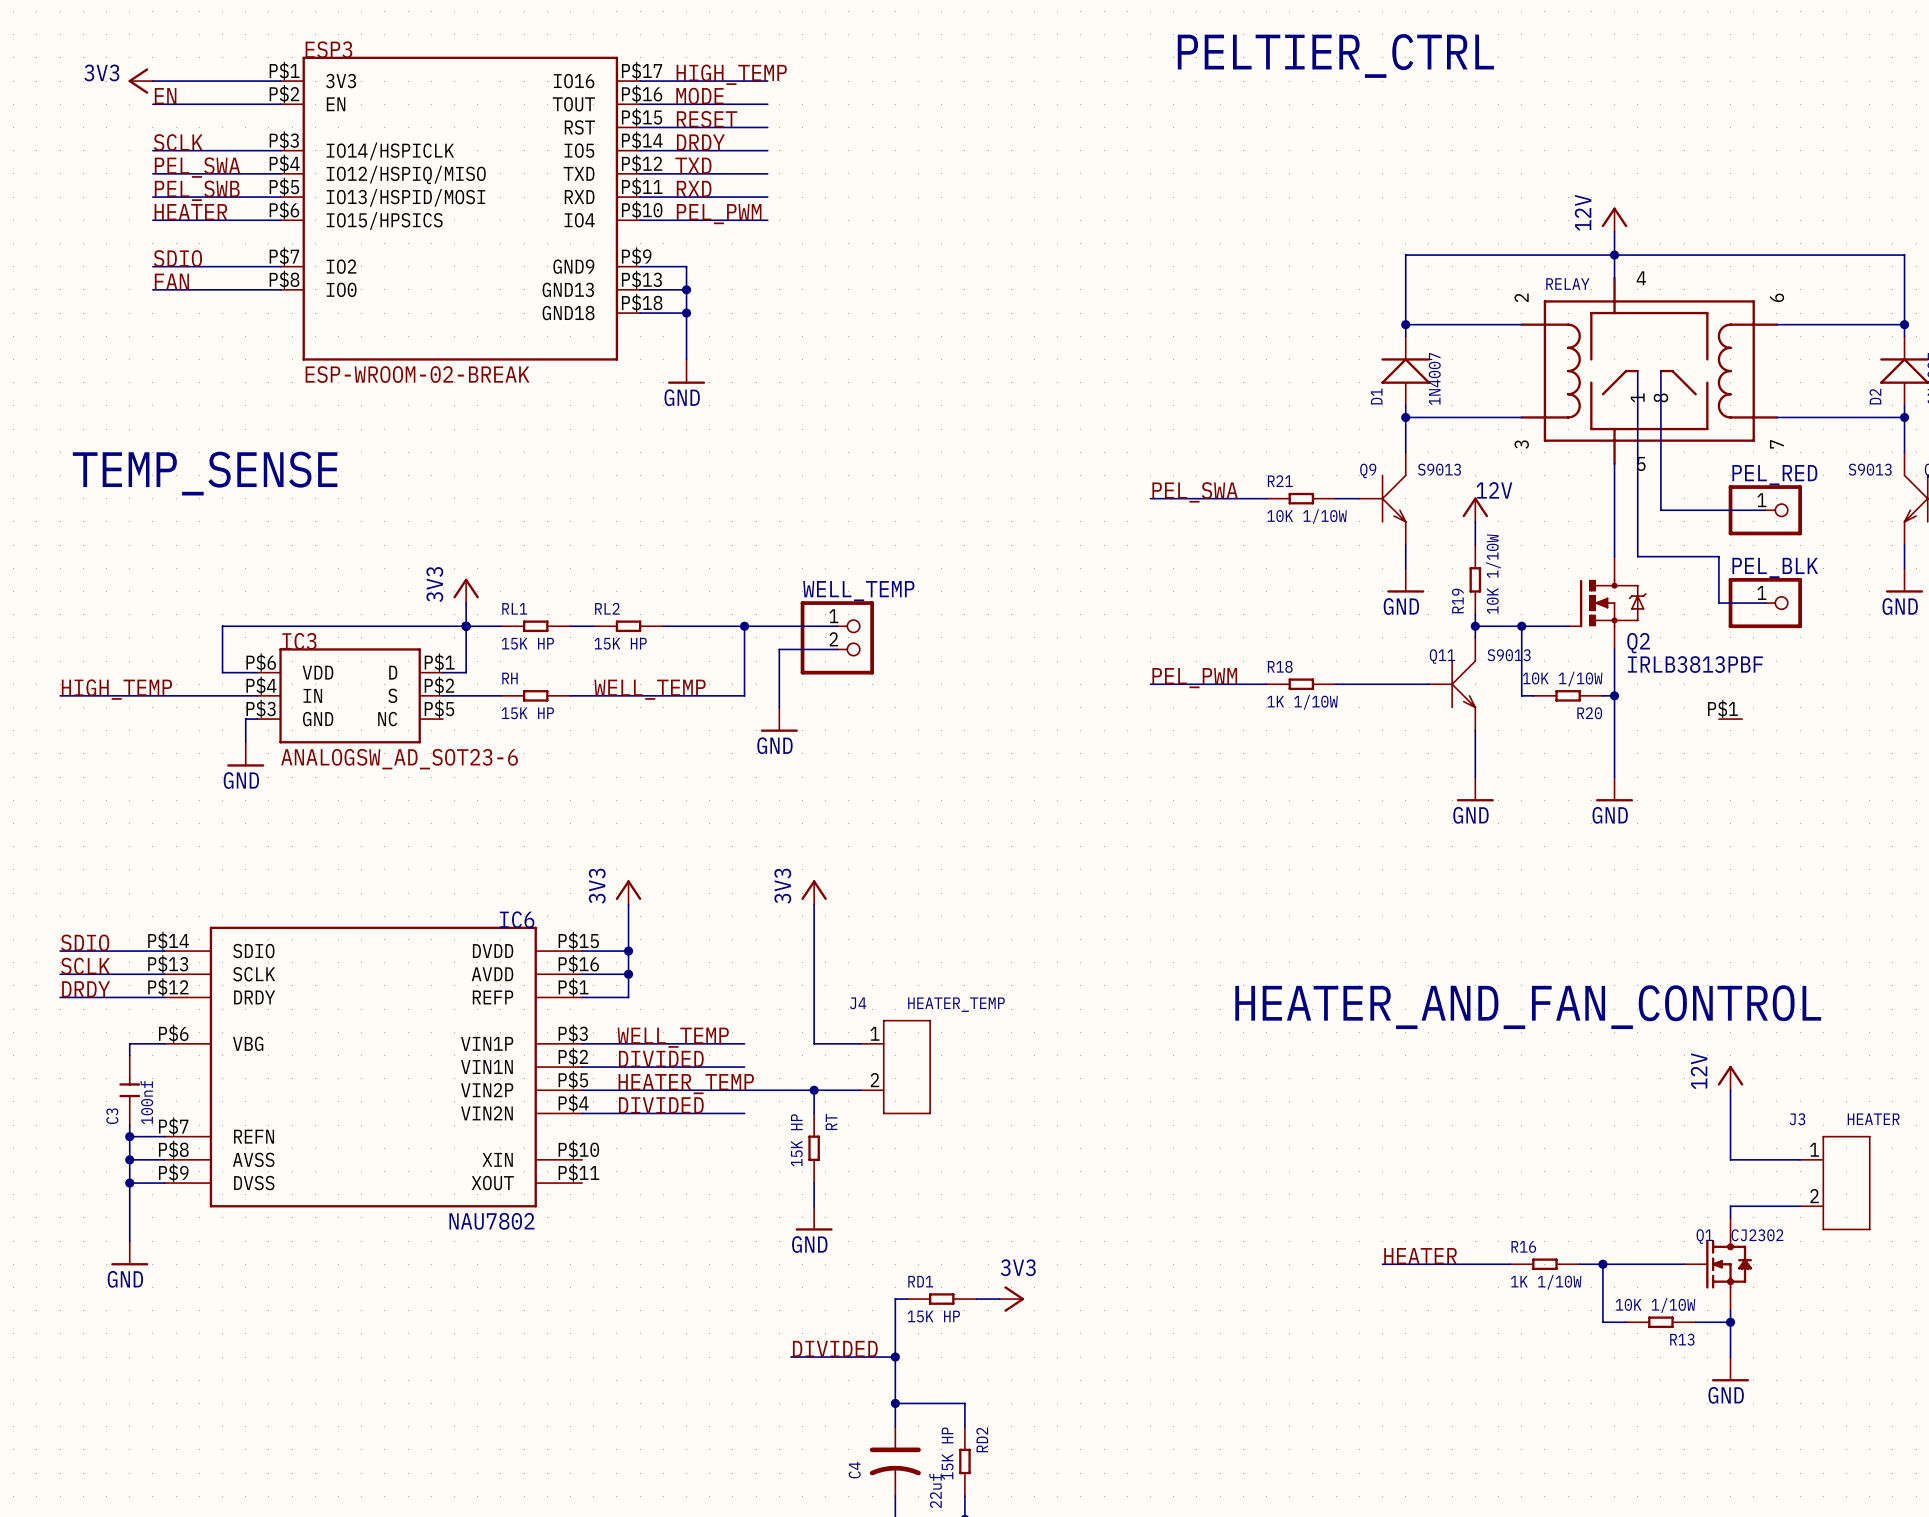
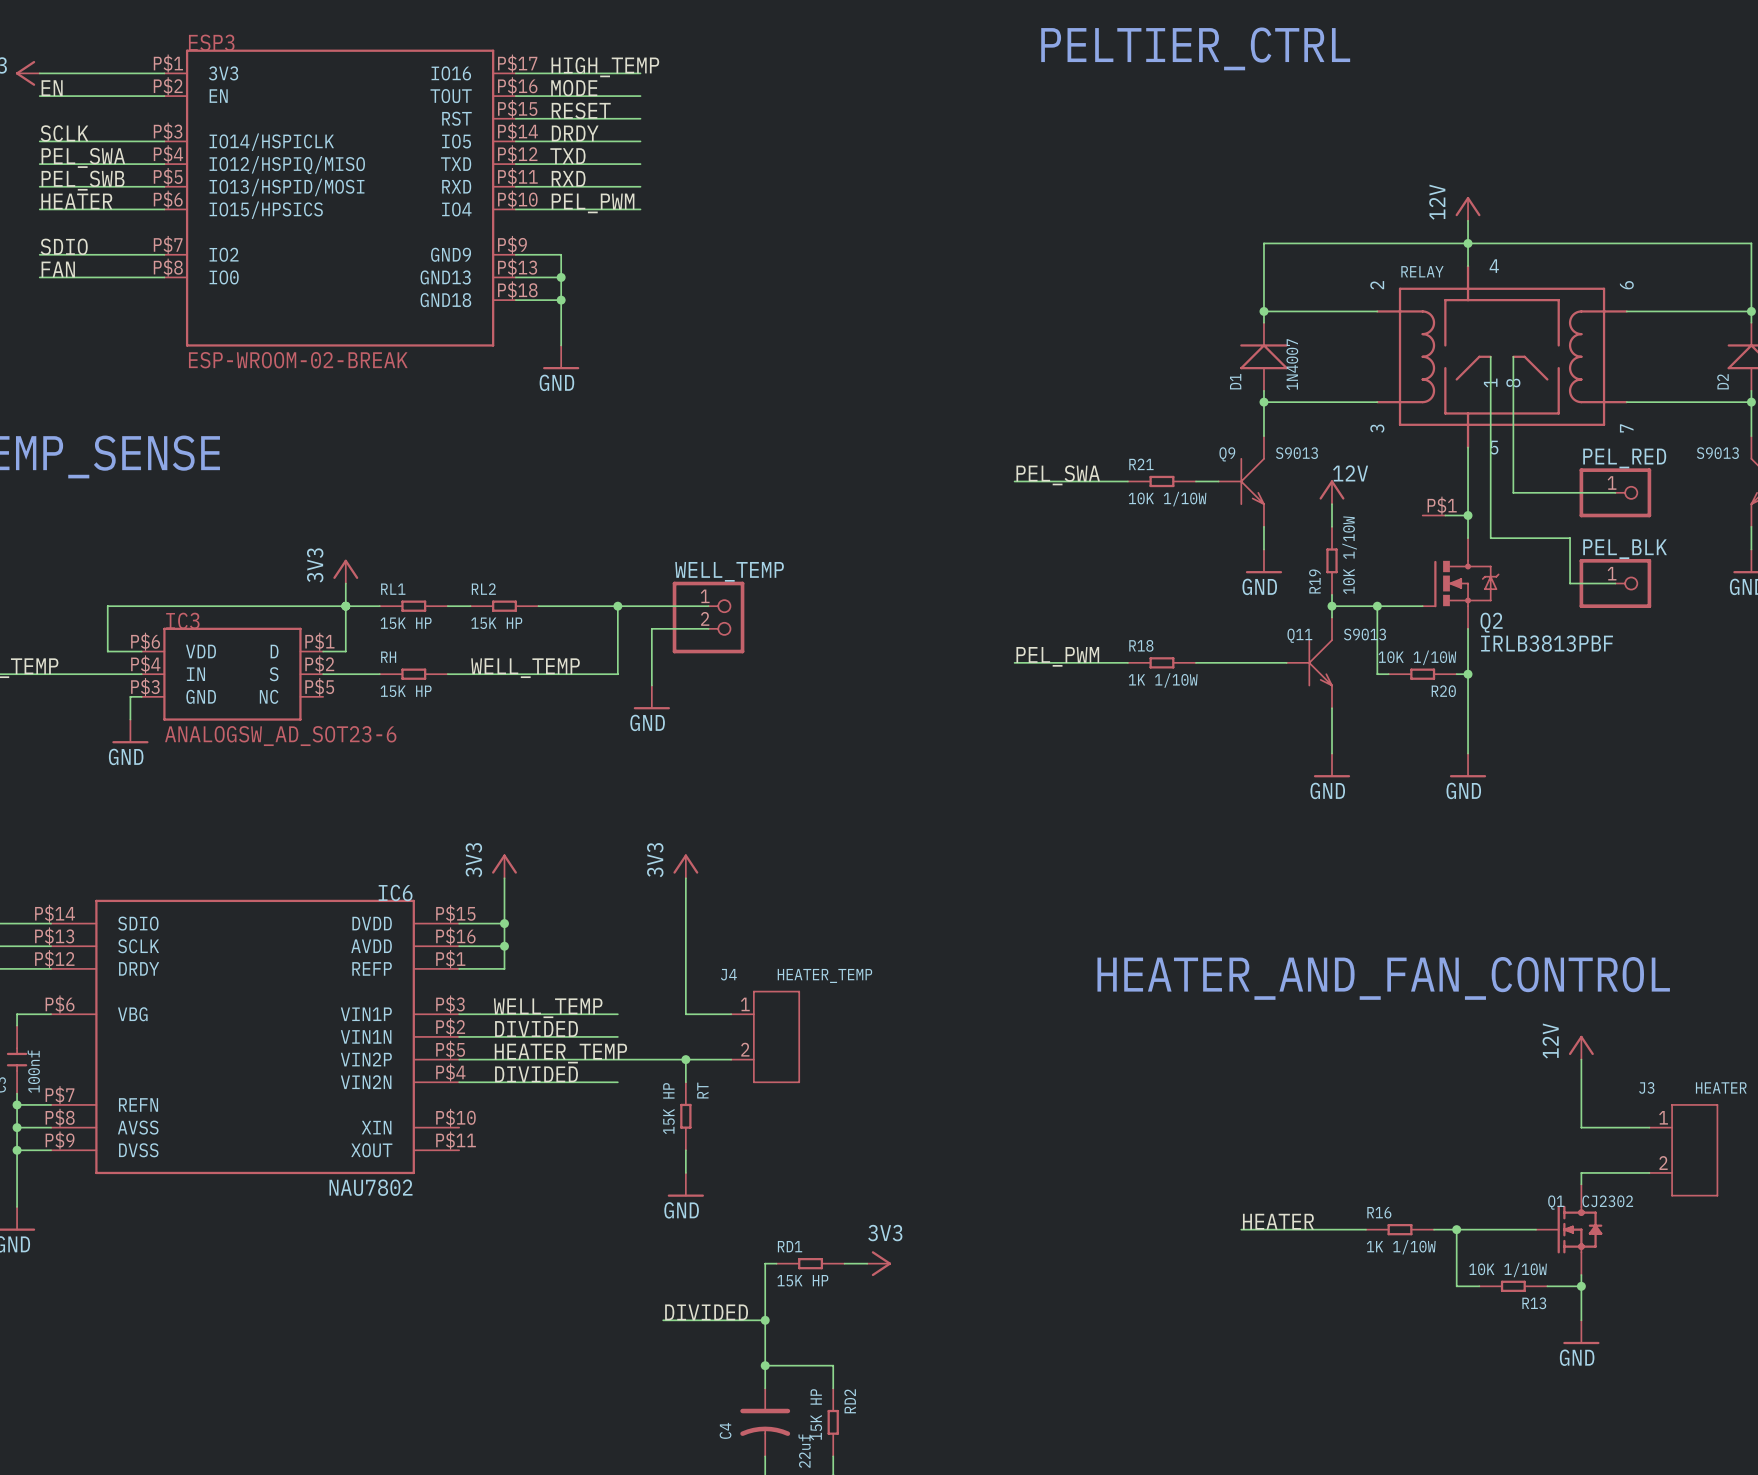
part: none -> (1434, 515)
wire: none -> (1445, 515) (1468, 515)
junction: none -> (1468, 515)
part: (1730, 719) -> none

